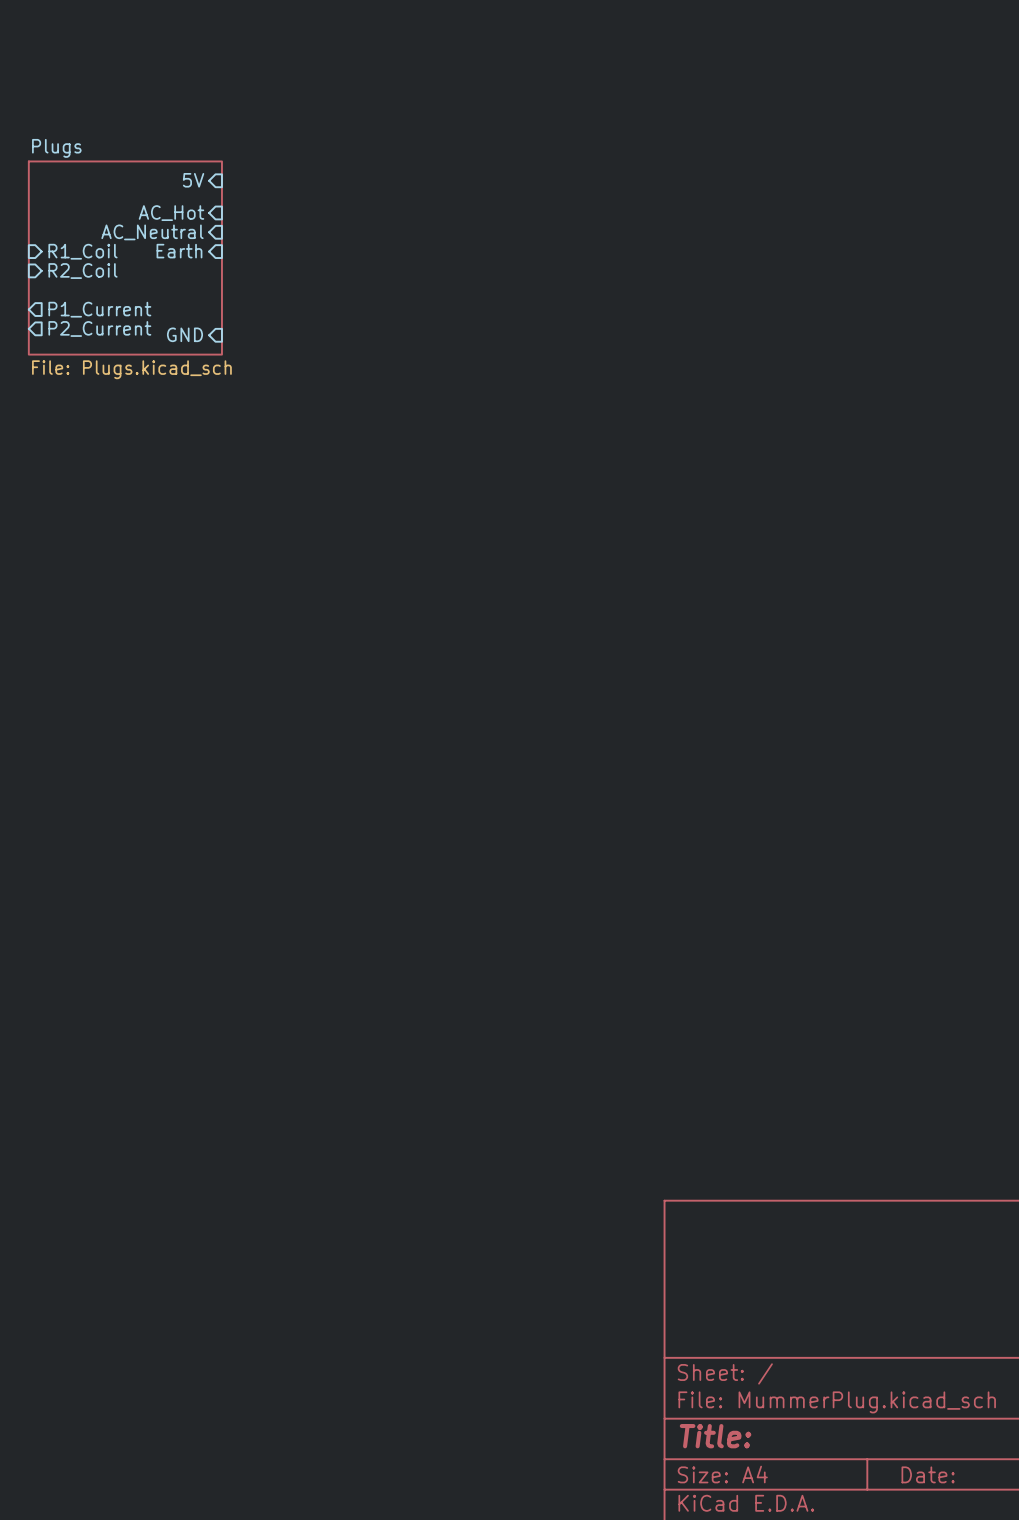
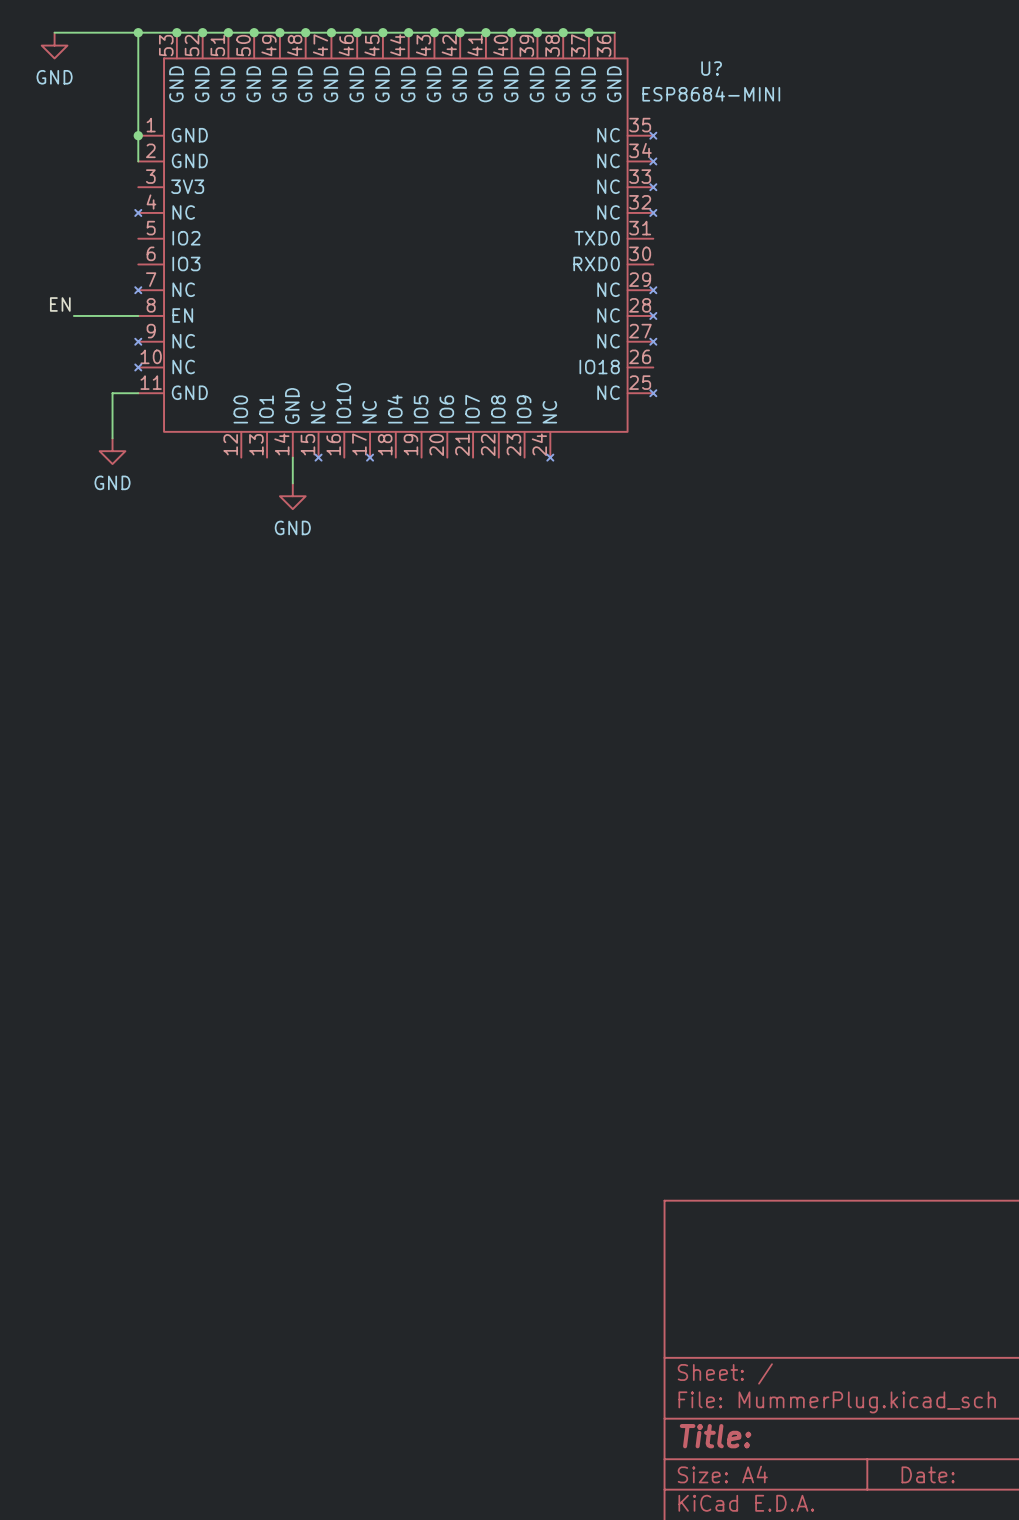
wire: none -> (54, 32) (614, 32)
wire: none -> (138, 32) (138, 161)
junction: none -> (138, 32)
junction: none -> (176, 32)
junction: none -> (202, 32)
junction: none -> (228, 32)
junction: none -> (254, 32)
junction: none -> (279, 32)
junction: none -> (305, 32)
junction: none -> (331, 32)
junction: none -> (357, 32)
junction: none -> (382, 32)
junction: none -> (408, 32)
junction: none -> (434, 32)
junction: none -> (460, 32)
junction: none -> (485, 32)
junction: none -> (511, 32)
junction: none -> (537, 32)
junction: none -> (563, 32)
junction: none -> (588, 32)
power symbol: none -> GND (54, 45)
junction: none -> (138, 135)
sheet pin: 5V (193, 180) -> none
sheet pin: AC_Hot (171, 213) -> none
sheet pin: AC_Neutral (152, 232) -> none
U?: none -> ESP8684-MINI (395, 246)
sheet pin: R1_Coil (82, 251) -> none
sheet pin: Earth (179, 251) -> none
sheet Plugs: File: Plugs.kicad_sch (125, 258) -> none
sheet pin: R2_Coil (82, 271) -> none
label: none -> EN (60, 304)
sheet pin: P1_Current (99, 309) -> none
wire: none -> (73, 315) (138, 315)
sheet pin: P2_Current (99, 328) -> none
sheet pin: GND (184, 334) -> none
wire: none -> (138, 393) (112, 393) (112, 438)
power symbol: none -> GND (112, 451)
wire: none -> (292, 457) (292, 483)
power symbol: none -> GND (292, 496)

